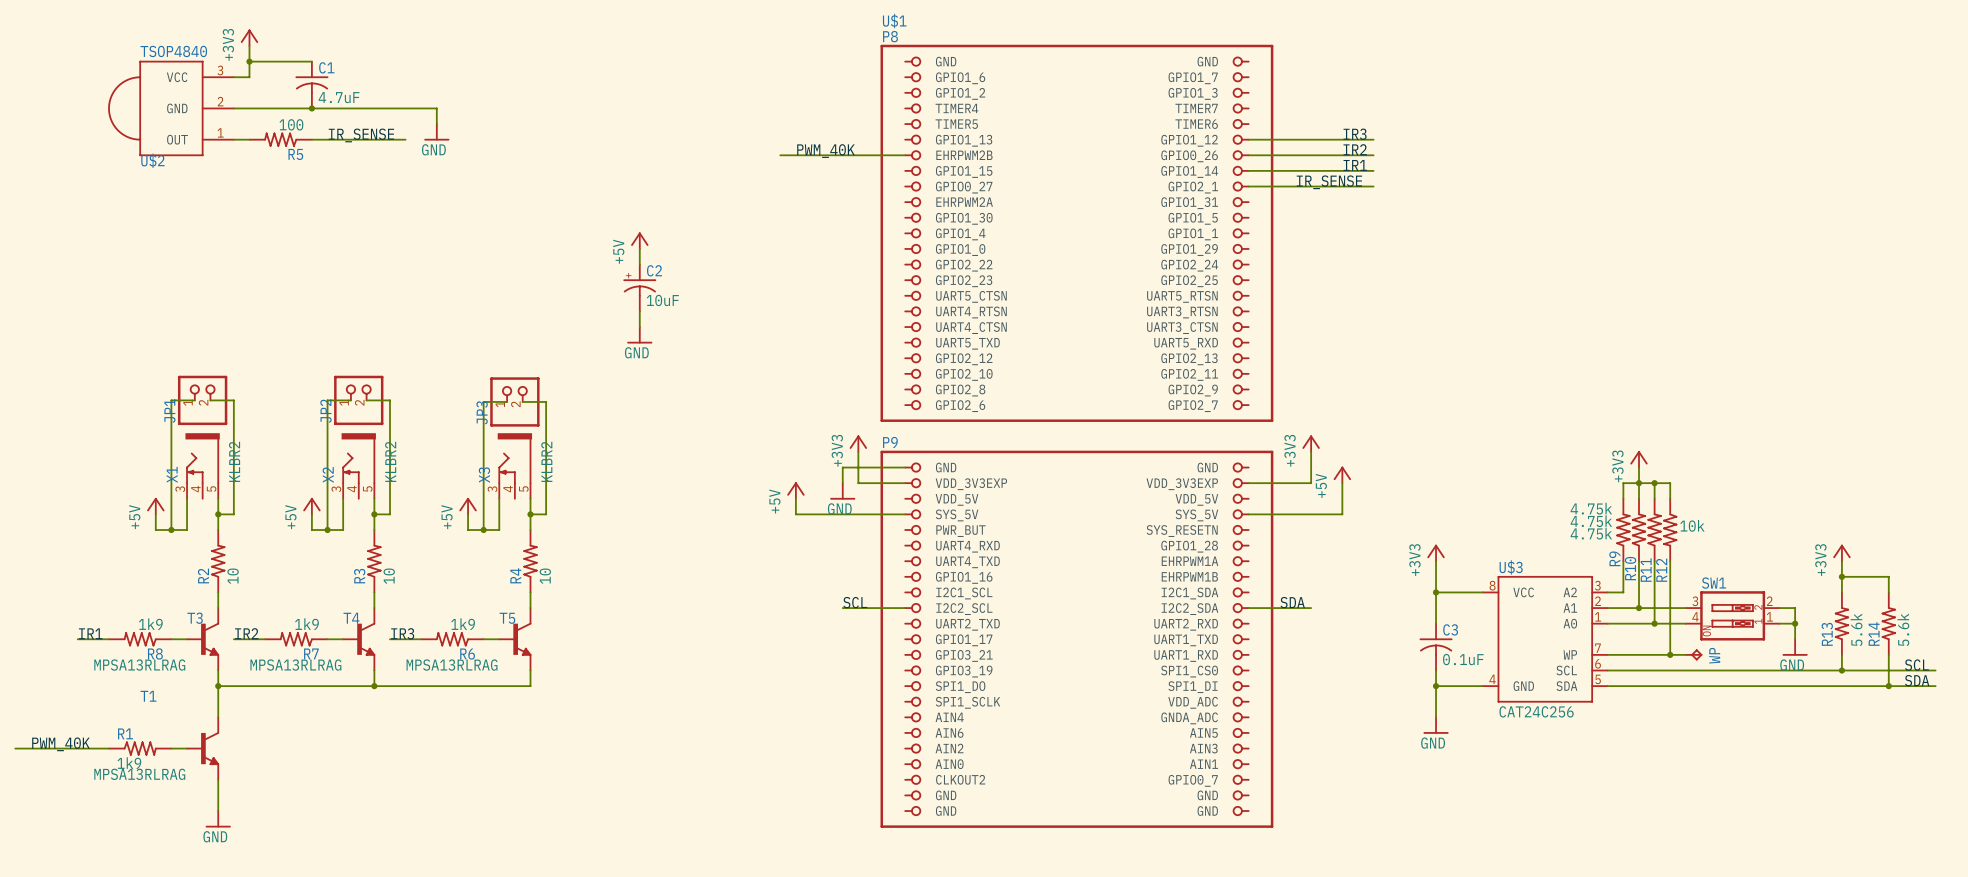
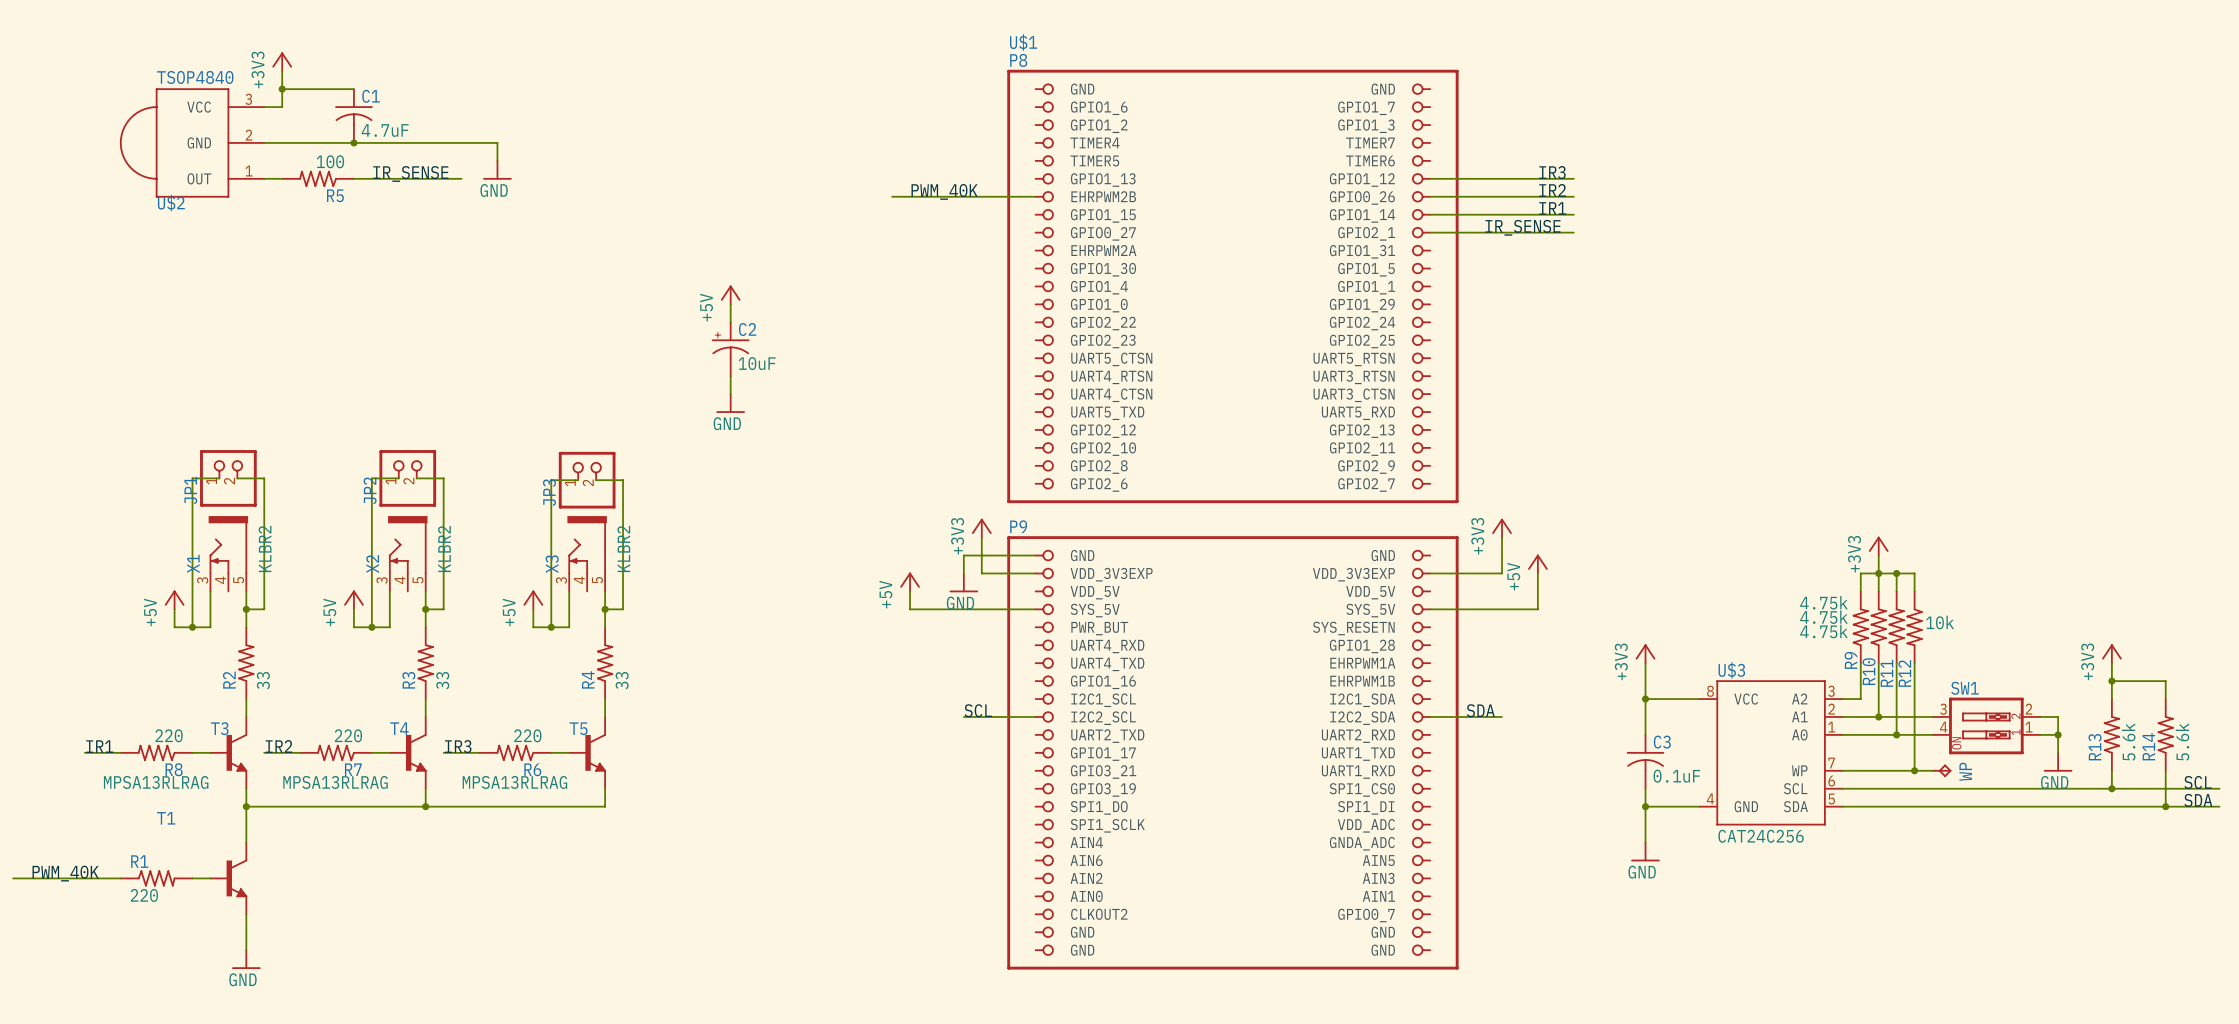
R2 value: 10 (233, 576) -> 33 (263, 680)
R3 value: 10 (389, 576) -> 33 (442, 680)
R4 value: 10 (545, 576) -> 33 (622, 680)
R8 value: 1k9 (150, 624) -> 220 (169, 735)
R7 value: 1k9 (306, 624) -> 220 (348, 735)
R6 value: 1k9 (463, 624) -> 220 (527, 735)
R1 value: 1k9 (129, 763) -> 220 (144, 895)
T1 value: MPSA13RLRAG (139, 774) -> none

